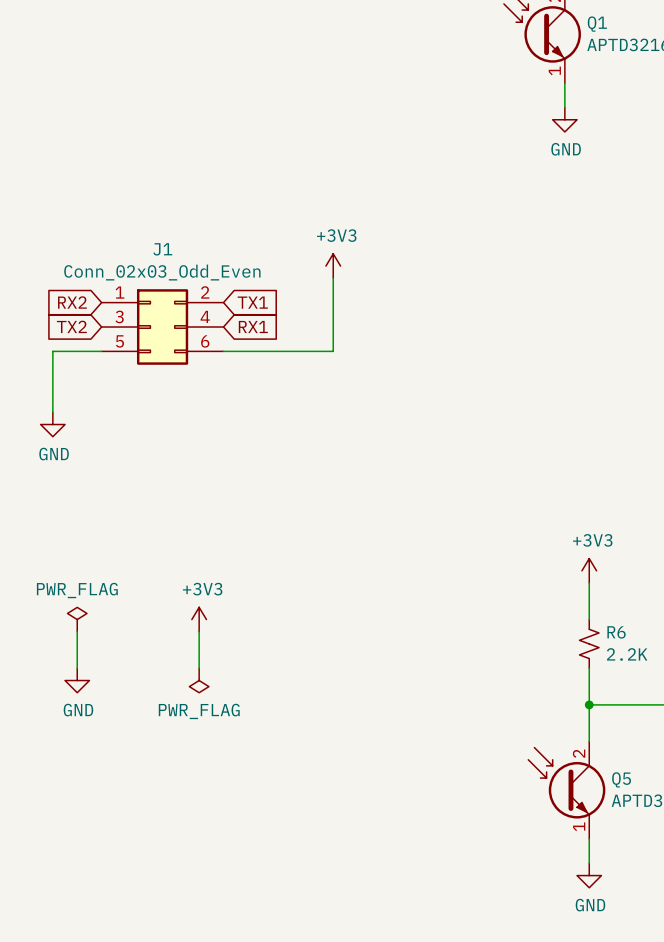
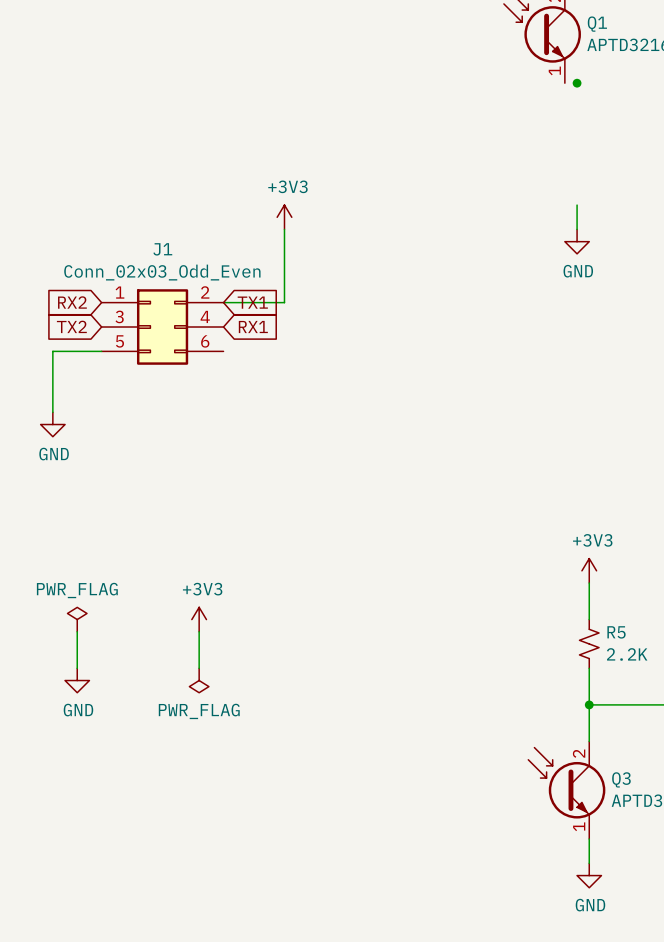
wire: (564, 83) (564, 107) -> (577, 205) (577, 229)
junction: none -> (577, 83)
power symbol position: GND (564, 119) -> GND (577, 241)
wire: none -> (284, 229) (284, 302) (223, 302)
power symbol position: +3V3 (333, 266) -> +3V3 (284, 217)
wire: (333, 278) (333, 351) (223, 351) -> none
R6 name: R6 (616, 632) -> R5 (616, 632)
Q5 name: Q5 (621, 779) -> Q3 (621, 779)

